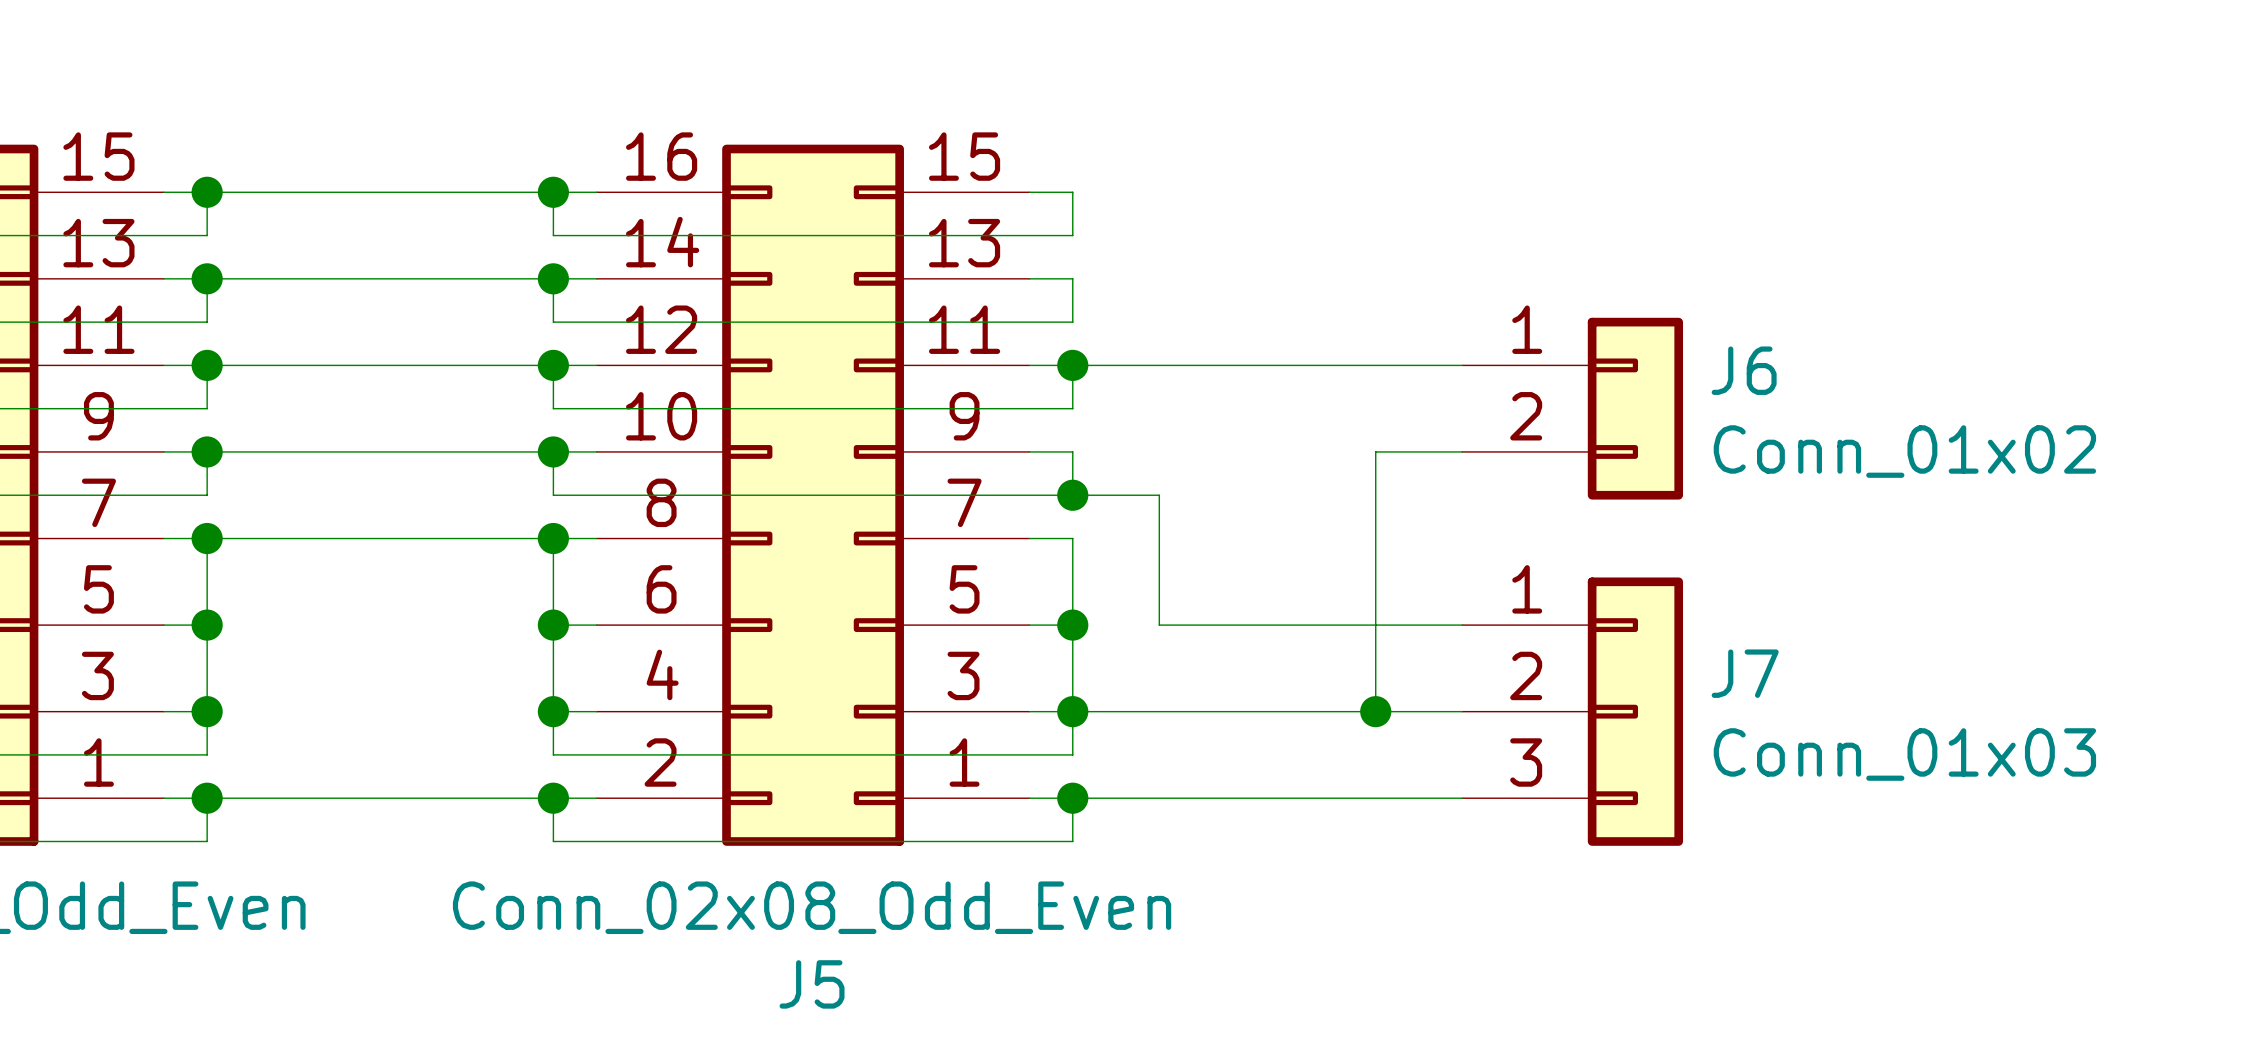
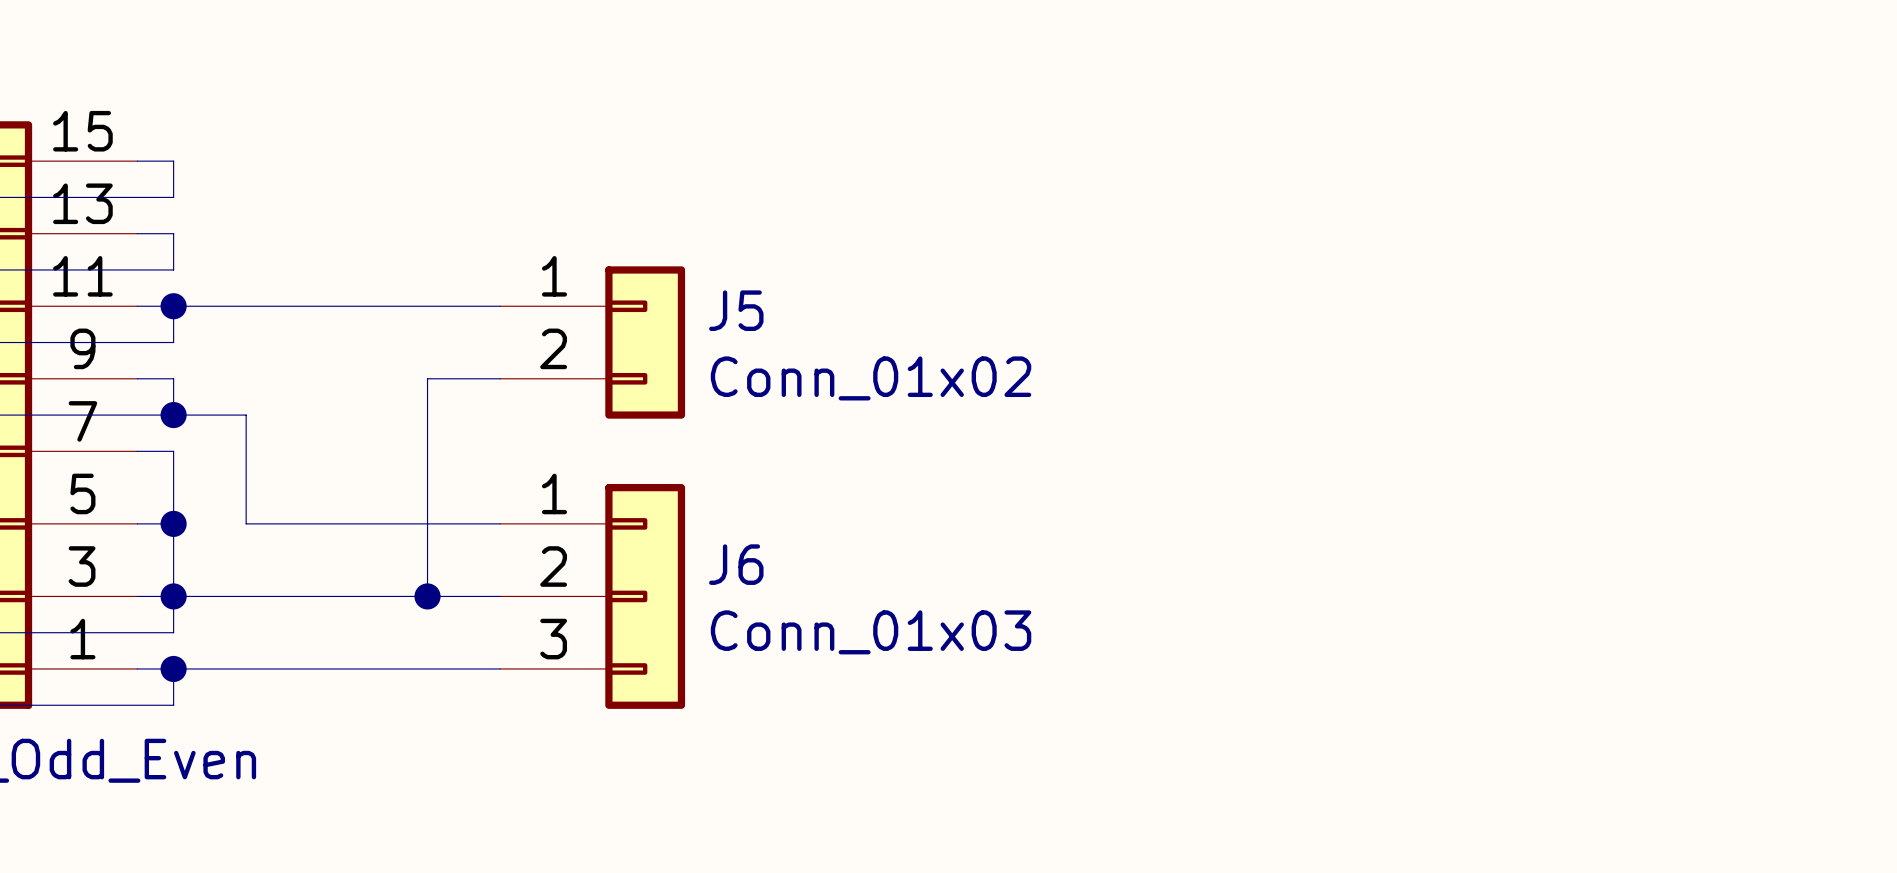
J5 symbol: [596, 144, 1030, 846] -> [500, 266, 686, 419]
wire: (207, 192) (596, 192) -> none
junction: (207, 192) -> none
wire: (553, 192) (553, 235) (1072, 235) (1072, 192) (1029, 192) -> none
junction: (553, 192) -> none
wire: (207, 278) (596, 278) -> none
junction: (207, 278) -> none
wire: (553, 278) (553, 322) (1072, 322) (1072, 278) (1029, 278) -> none
junction: (553, 278) -> none
J6 symbol: [1462, 317, 1684, 500] -> [500, 483, 686, 709]
wire: (553, 365) (553, 408) (1072, 408) (1072, 365) -> none
junction: (553, 365) -> none
wire: (1029, 365) (1462, 365) -> none
junction: (1072, 365) -> none
wire: (207, 451) (510, 451) -> (427, 596) (427, 378)
junction: (207, 451) -> none
wire: (553, 451) (553, 495) (1159, 495) (1159, 625) (1462, 625) -> none
junction: (553, 451) -> none
wire: (1029, 451) (1072, 451) (1072, 495) -> none
wire: (1462, 451) (1375, 451) (1375, 711) -> none
J6 value: Conn_01x02 (1904, 451) -> Conn_01x03 (871, 632)
wire: none -> (173, 415) (246, 415) (246, 523) (463, 523)
junction: none -> (173, 415)
junction: (1072, 495) -> none
wire: (207, 538) (596, 538) -> none
junction: (207, 538) -> none
wire: (553, 538) (553, 754) (1072, 754) (1072, 538) (1029, 538) -> none
junction: (553, 538) -> none
junction: (553, 625) -> none
wire: (1029, 625) (1072, 625) -> none
junction: (1072, 625) -> none
wire: none -> (173, 596) (463, 596)
junction position: (553, 711) -> (427, 596)
wire: (1029, 711) (1462, 711) -> none
junction: (1072, 711) -> none
junction: (1375, 711) -> none
J7: Conn_01x03 (1572, 711) -> none
wire: (553, 798) (553, 841) (1072, 841) (1072, 798) -> none
junction: (553, 798) -> none
wire: (1029, 798) (1462, 798) -> none
junction: (1072, 798) -> none
J5 value: Conn_02x08_Odd_Even (812, 907) -> Conn_01x02 (871, 378)
J5 name position: J5 (812, 984) -> J5 (736, 310)

